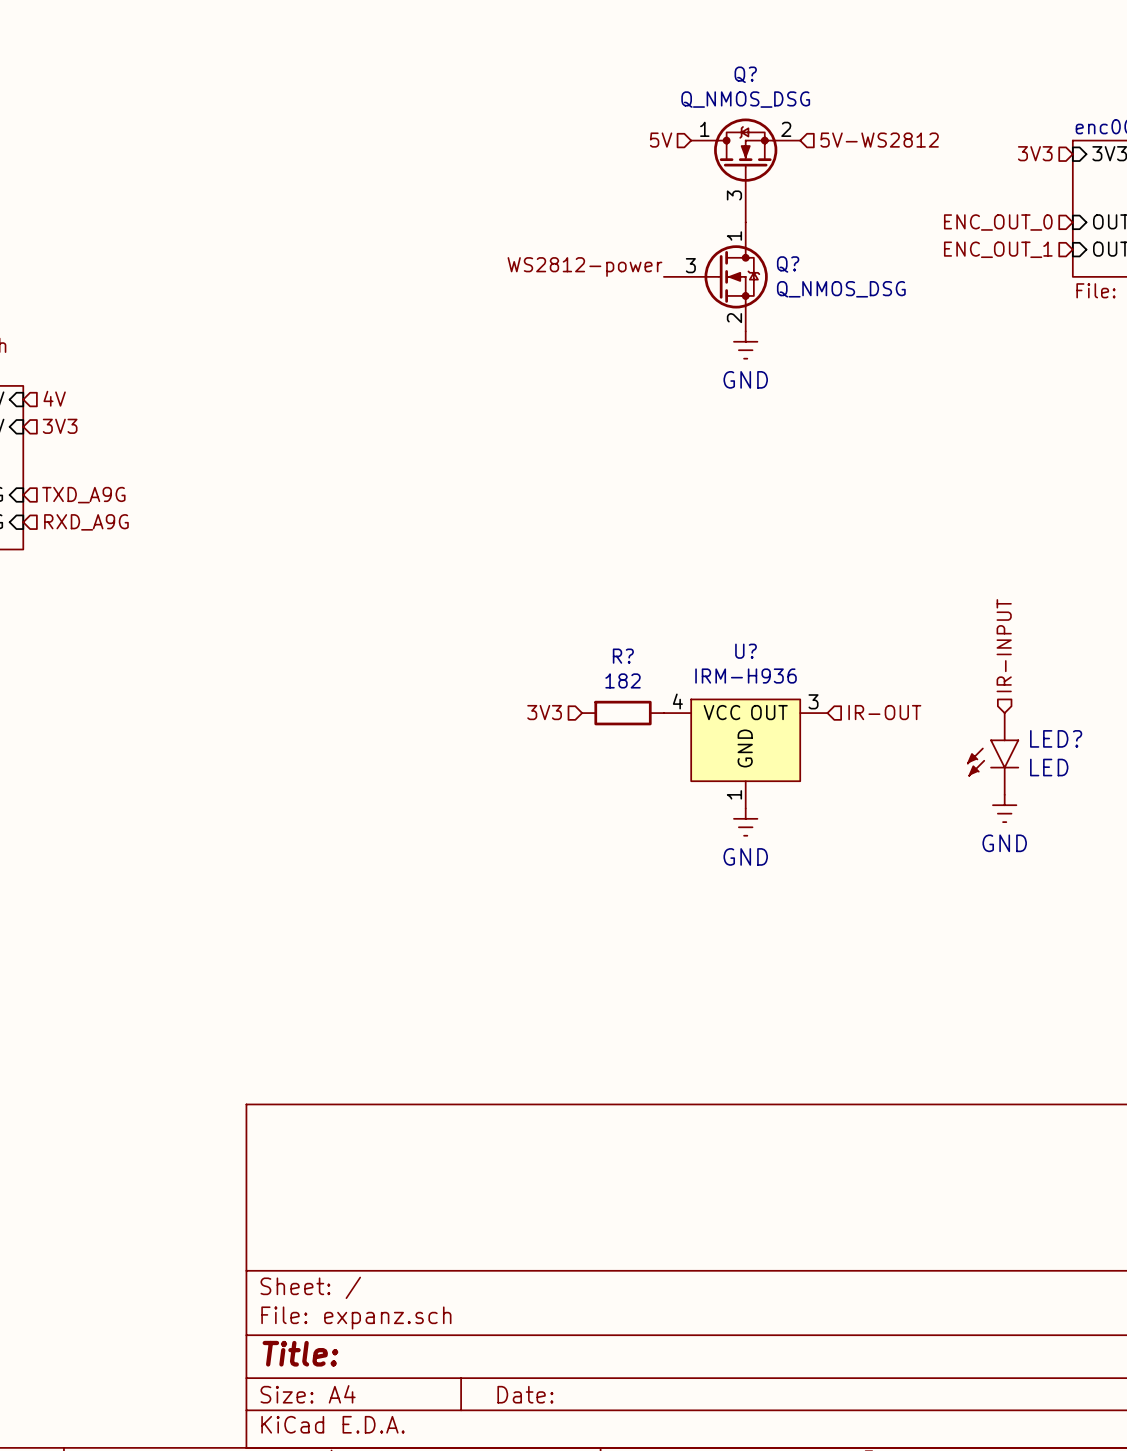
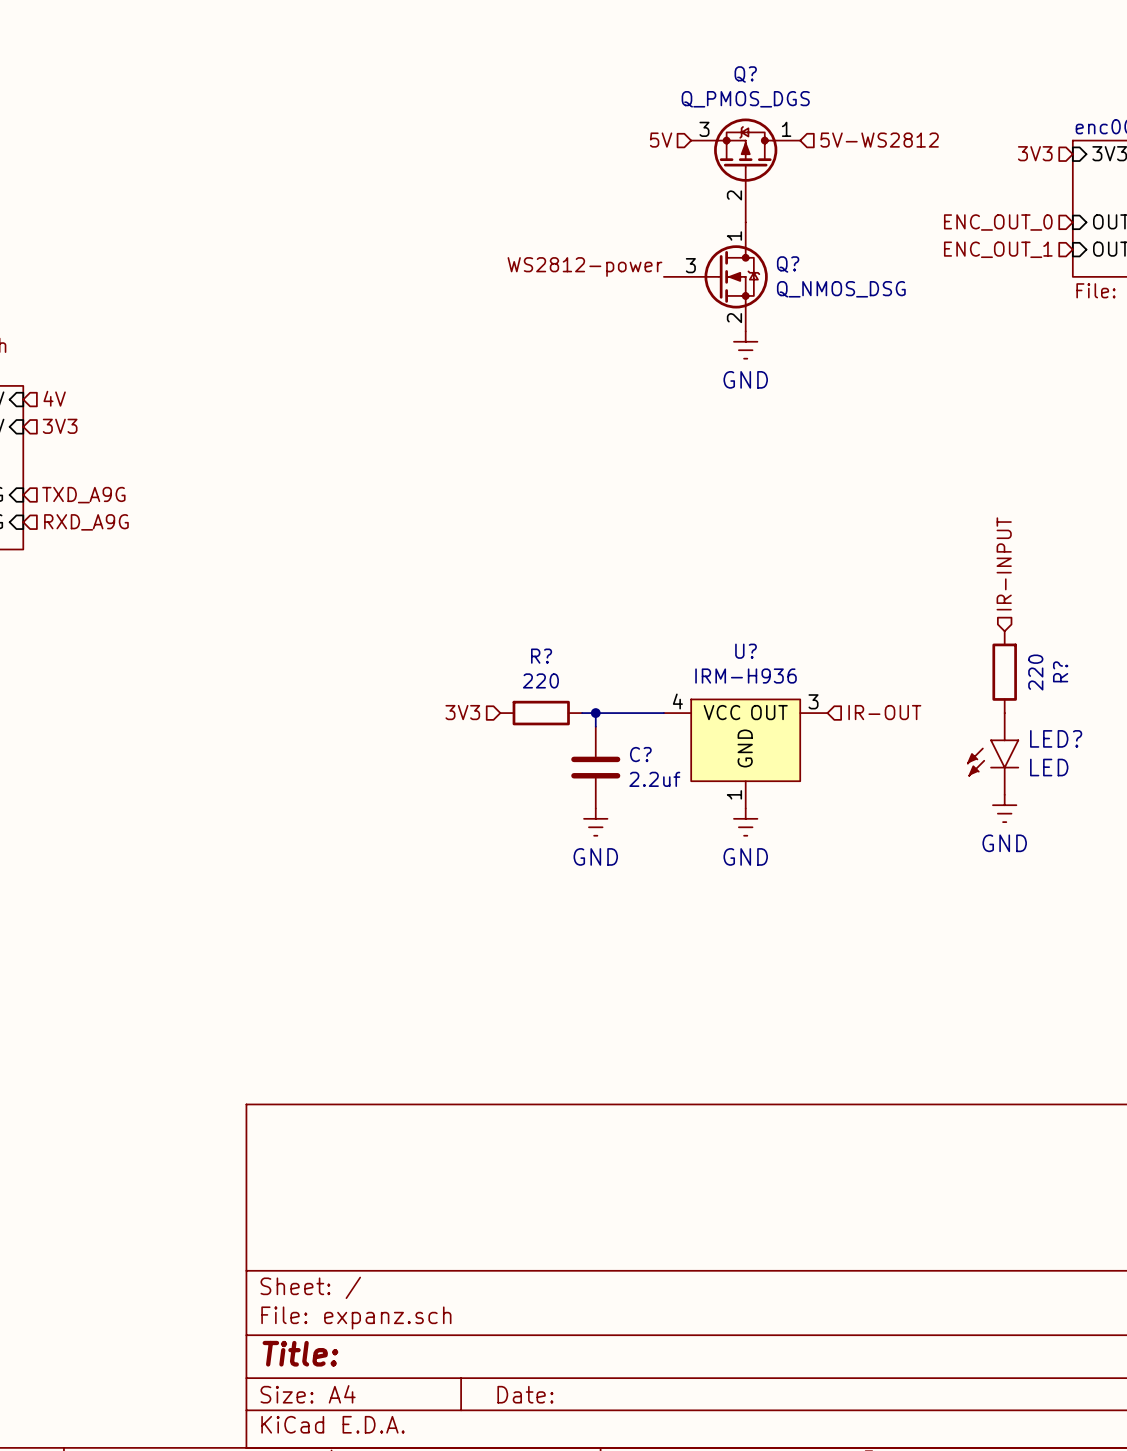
Q? value: Q_NMOS_DSG (745, 99) -> Q_PMOS_DGS (745, 99)
Q? symbol: [691, 118, 801, 223] -> [691, 118, 801, 223]
hierarchical label position: IR-INPUT (1004, 645) -> IR-INPUT (1004, 563)
R?: none -> 220 (1004, 672)
hierarchical label position: 3V3 (544, 712) -> 3V3 (462, 712)
R?: none -> 220 (541, 713)
wire: none -> (582, 713) (663, 713)
junction: none -> (595, 713)
R?: 182 (623, 713) -> none
C?: none -> 2.2uf (595, 767)
power symbol: none -> GND (595, 822)

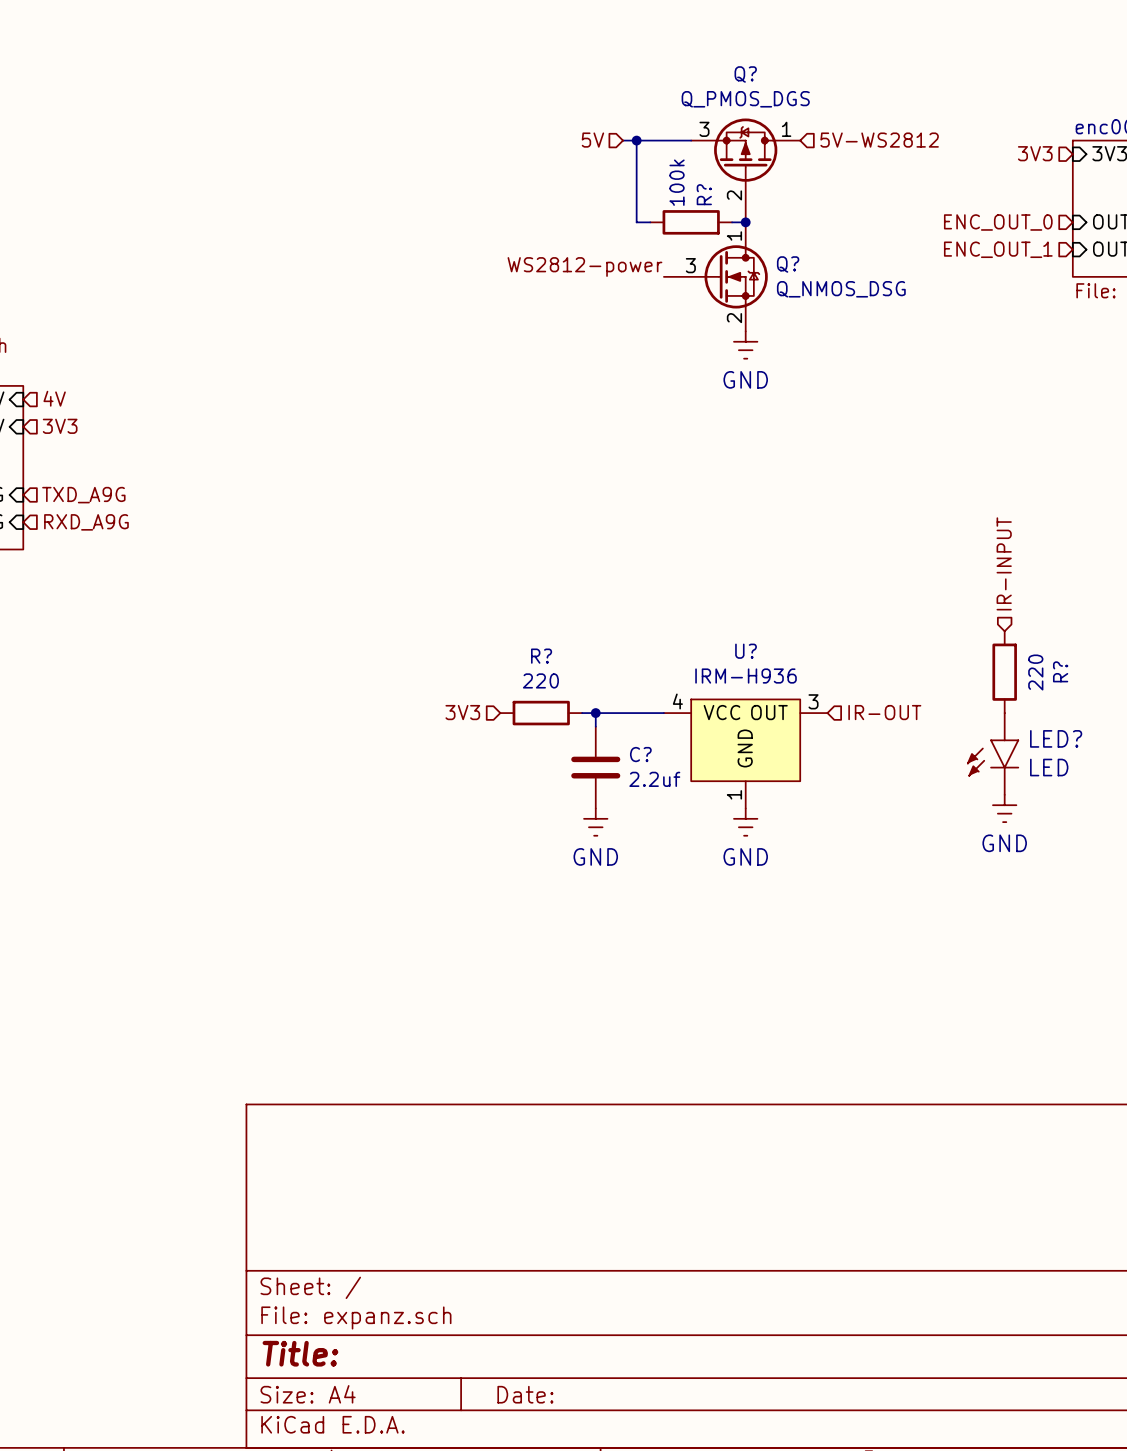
wire: none -> (623, 140) (691, 140)
wire: none -> (636, 140) (636, 222) (650, 222)
junction: none -> (636, 140)
hierarchical label position: 5V (661, 140) -> 5V (592, 140)
R?: none -> 100k (691, 222)
wire: none -> (732, 222) (745, 222)
junction: none -> (745, 222)

